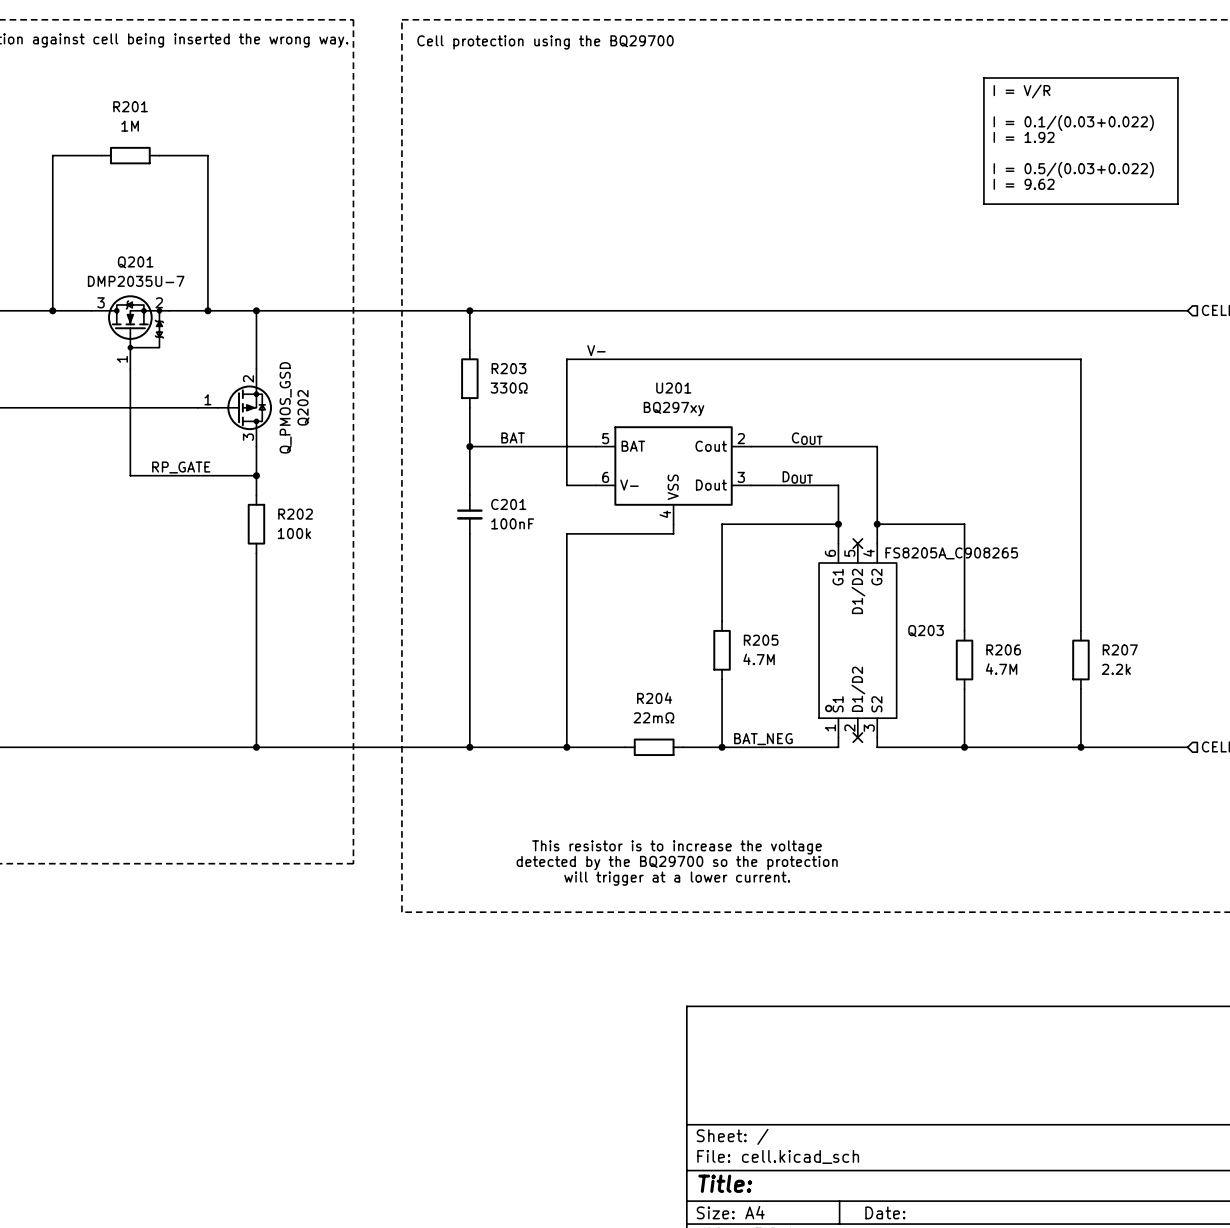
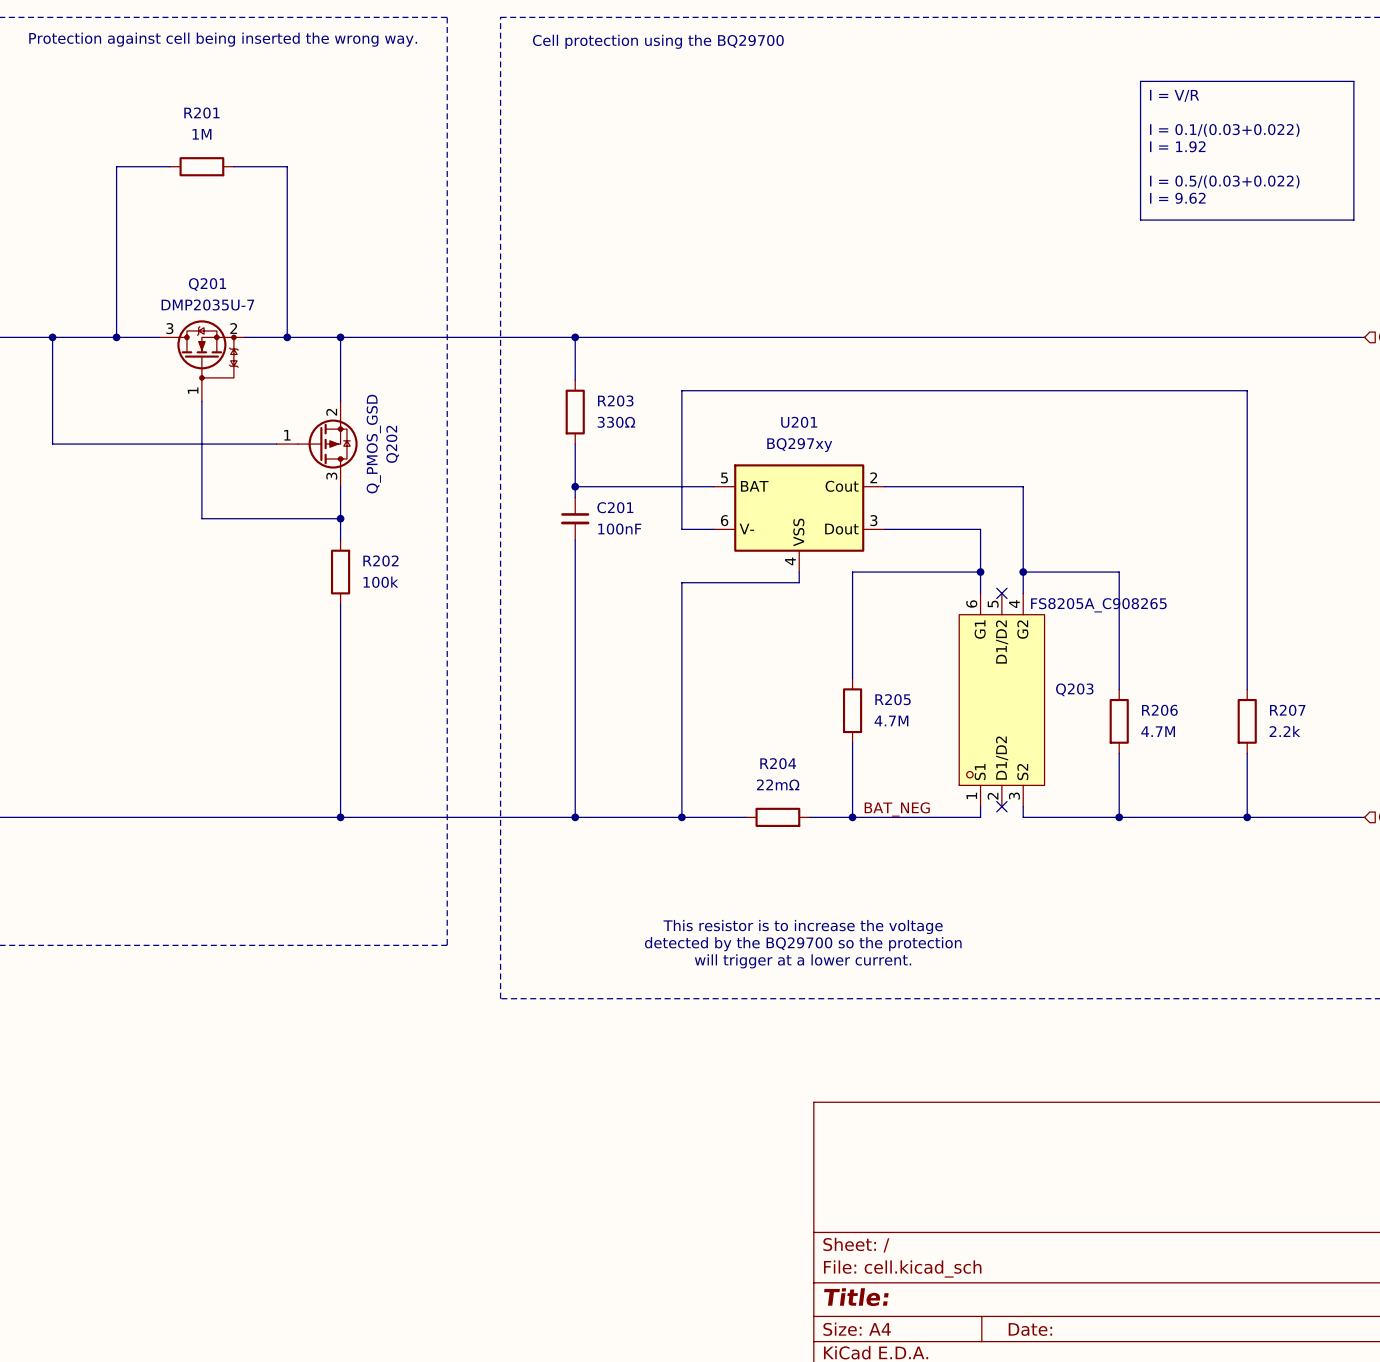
label: V- (596, 350) -> none
label: BAT (513, 437) -> none
label: COUT (807, 438) -> none
label: RP_GATE (181, 467) -> none
label: DOUT (797, 477) -> none
C201 position: (469, 514) -> (575, 518)

